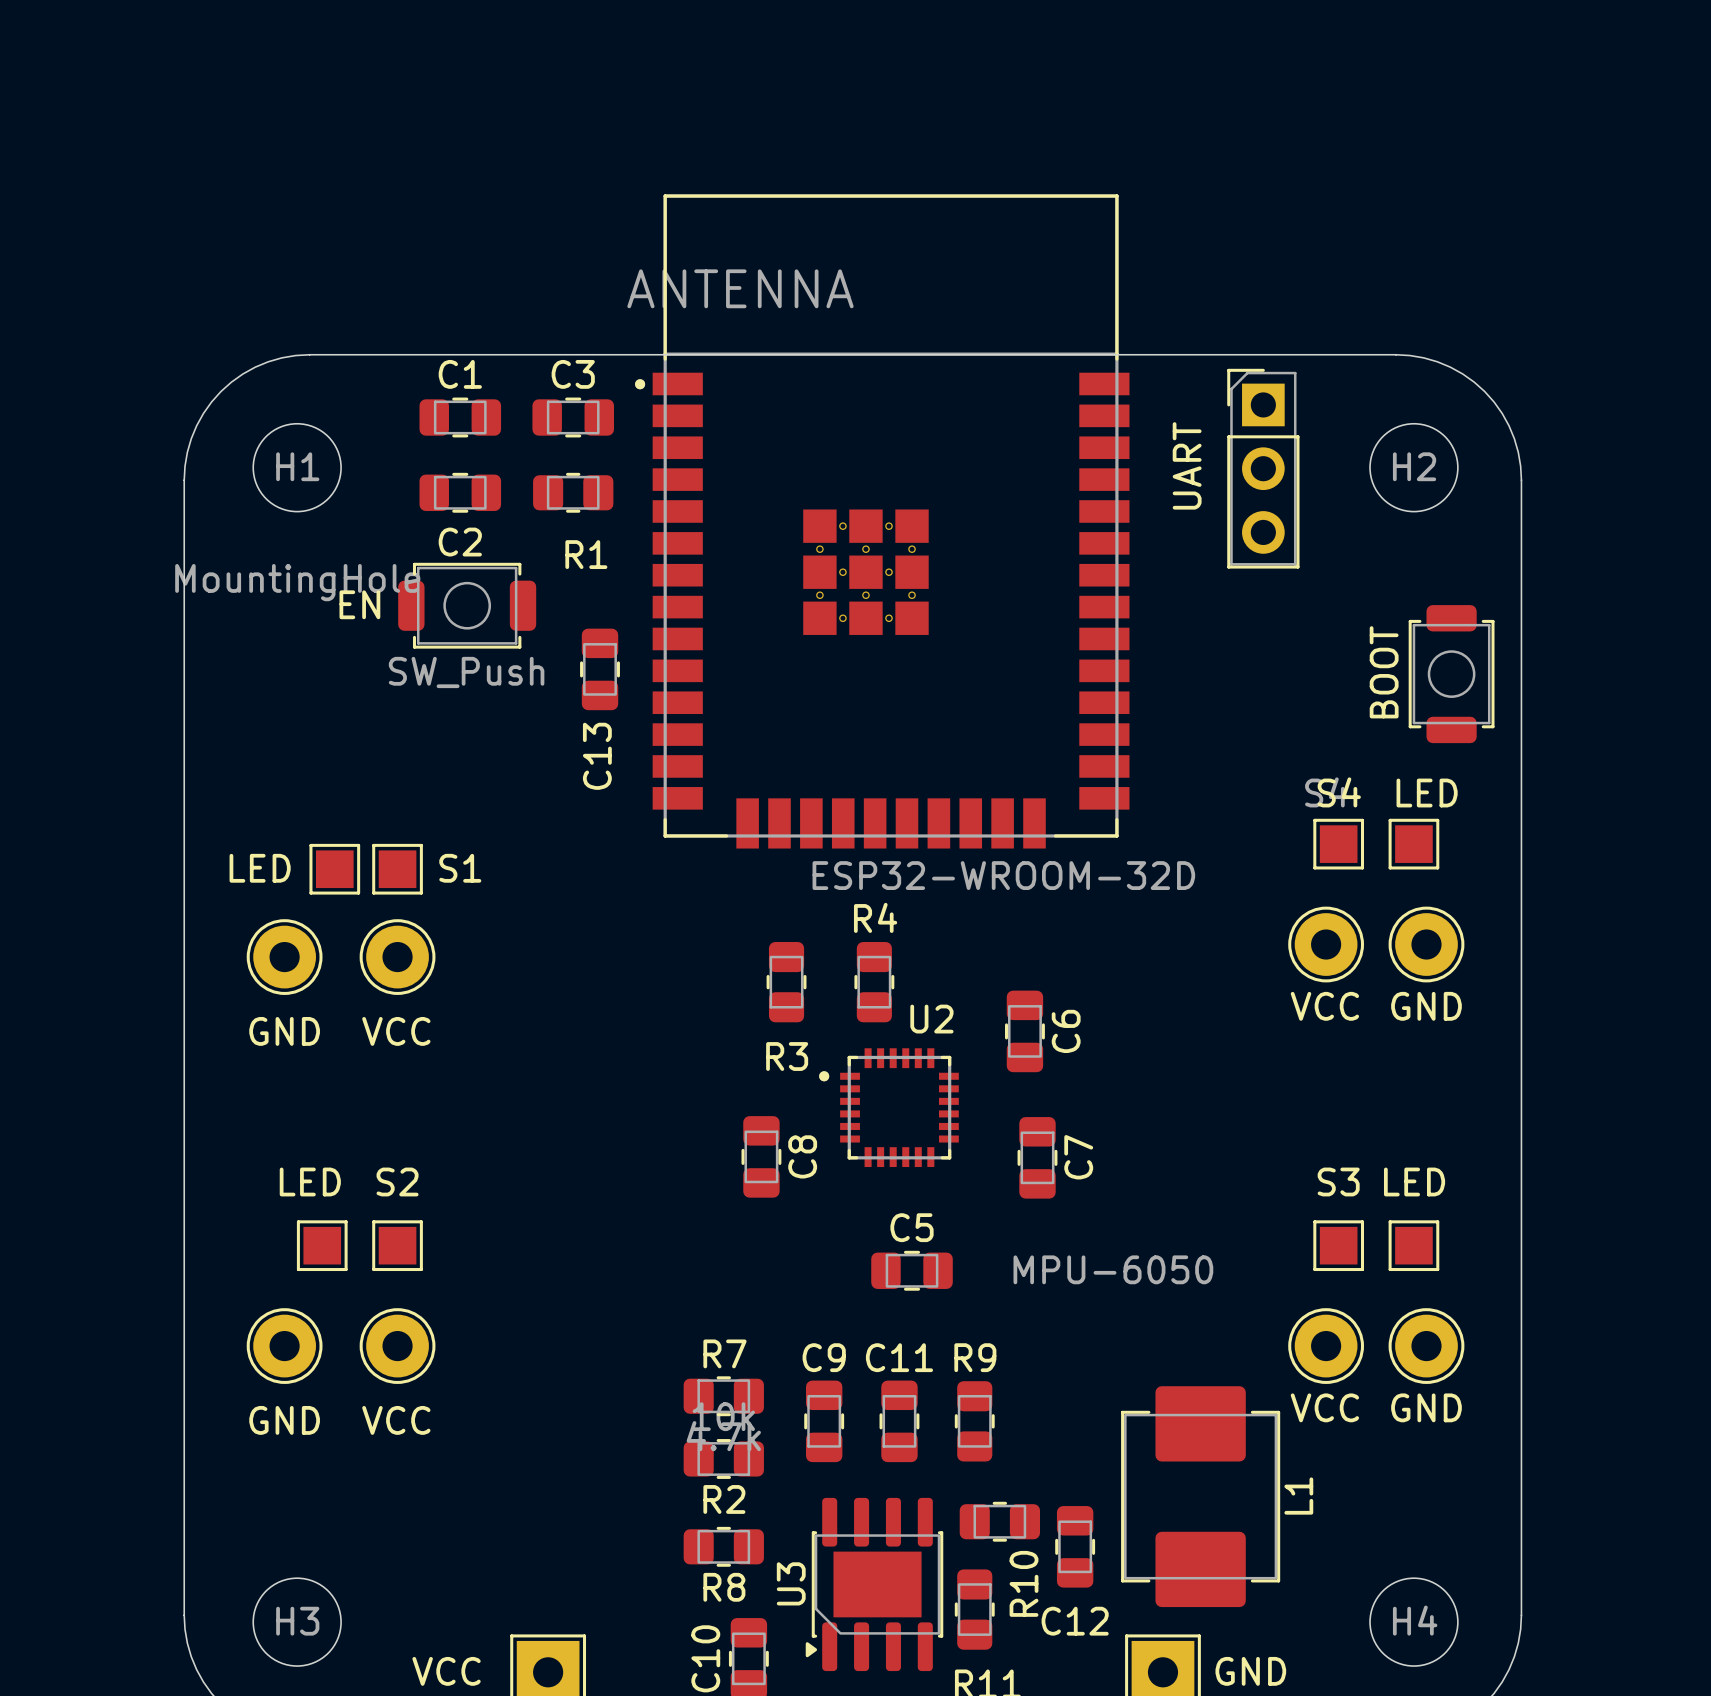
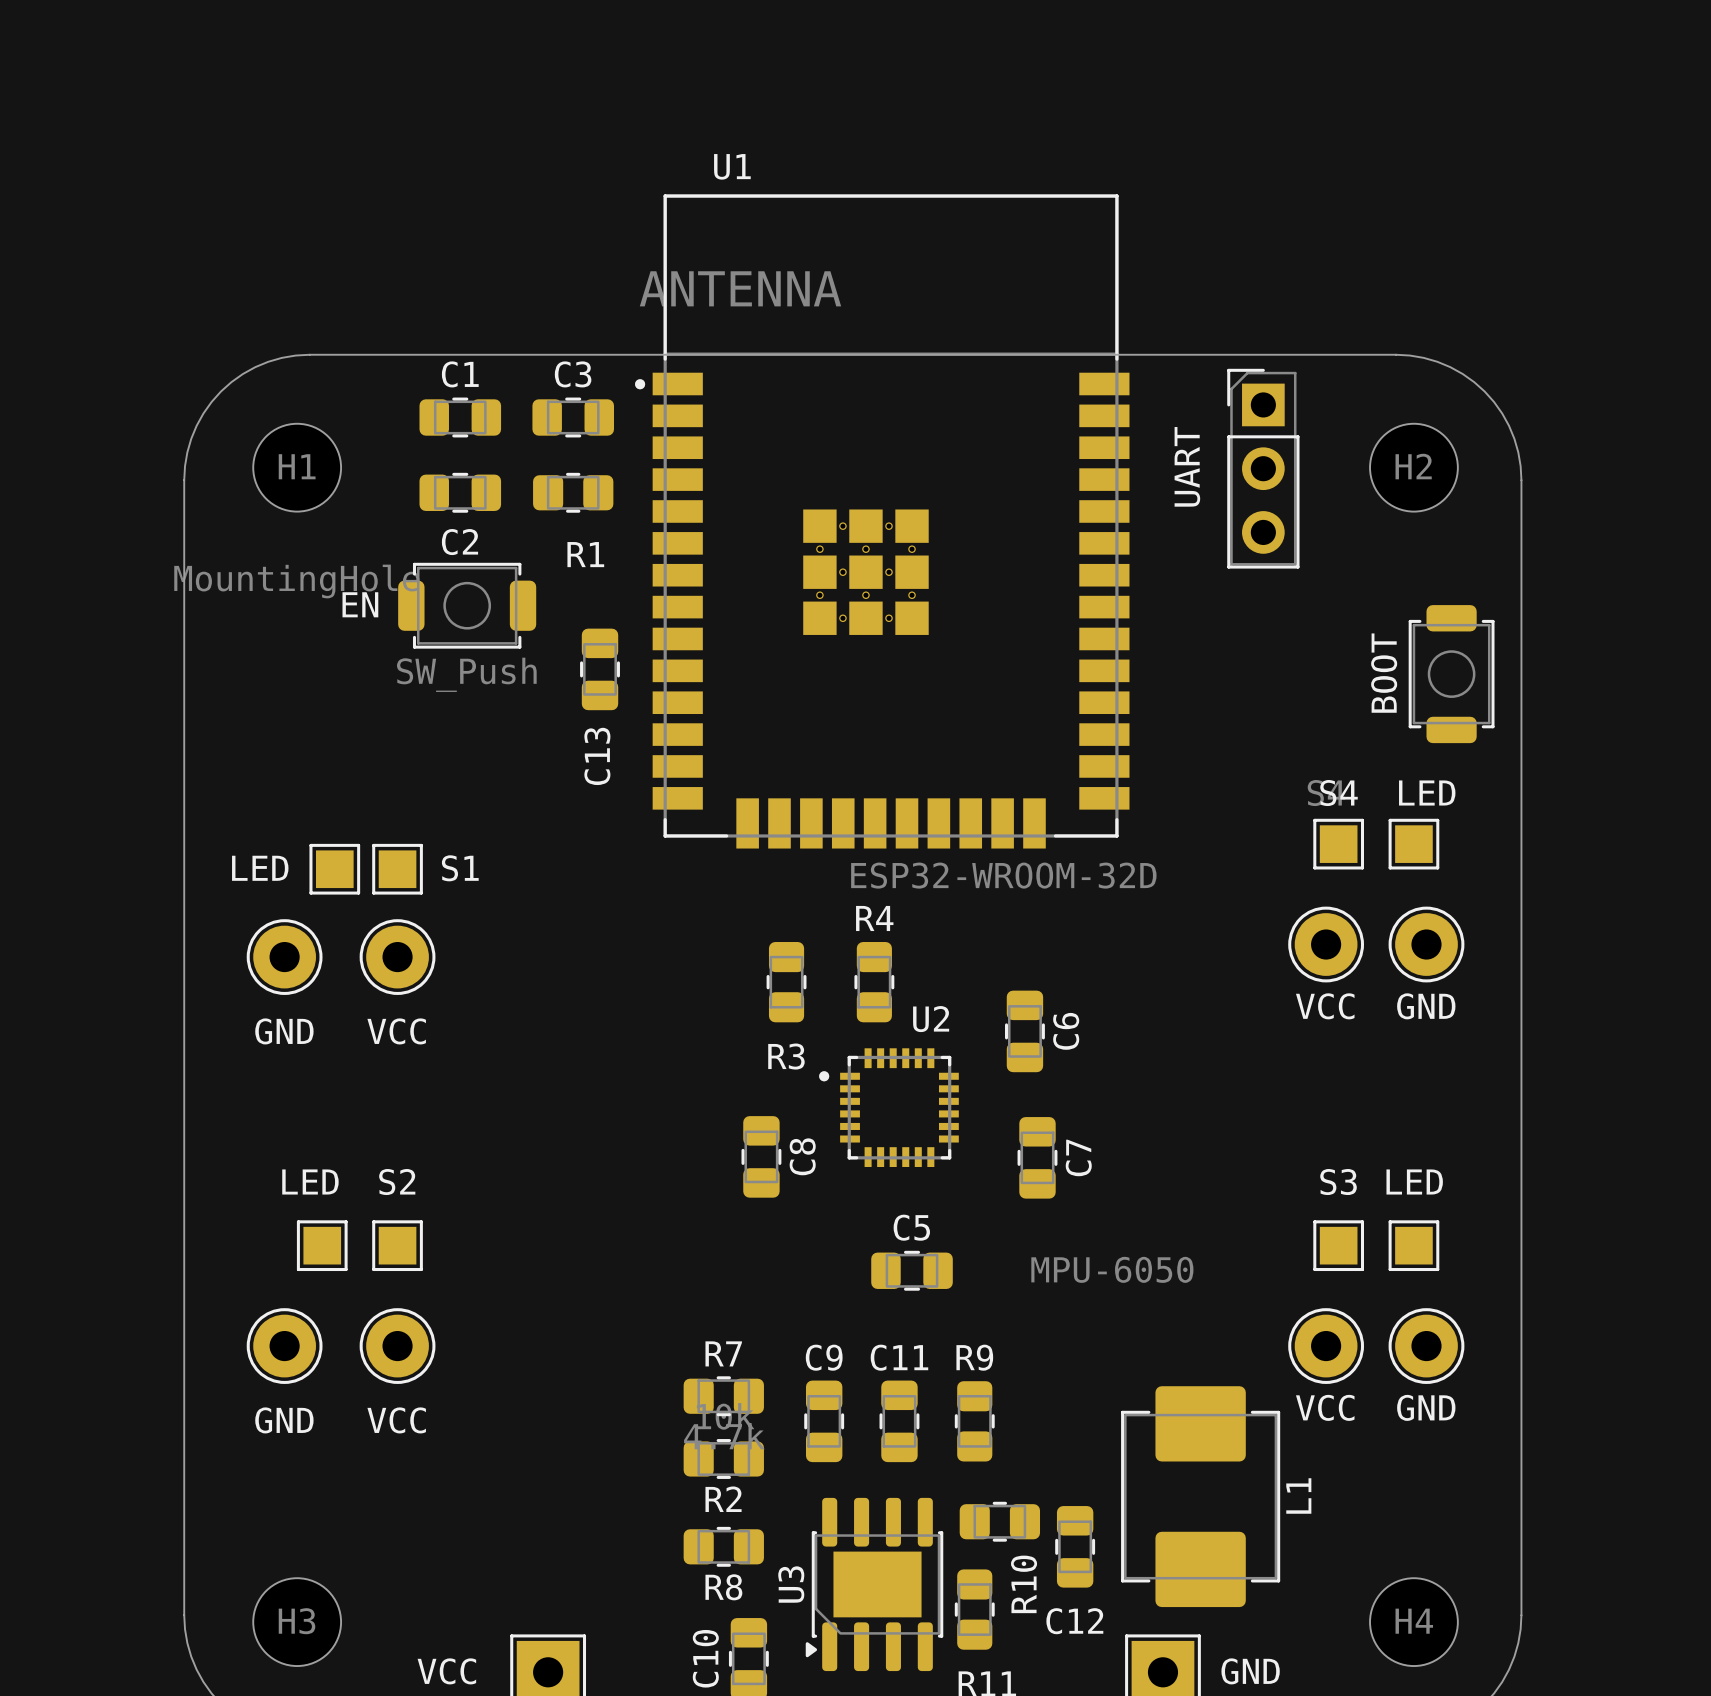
U1 name: none -> U1 (732, 166)

